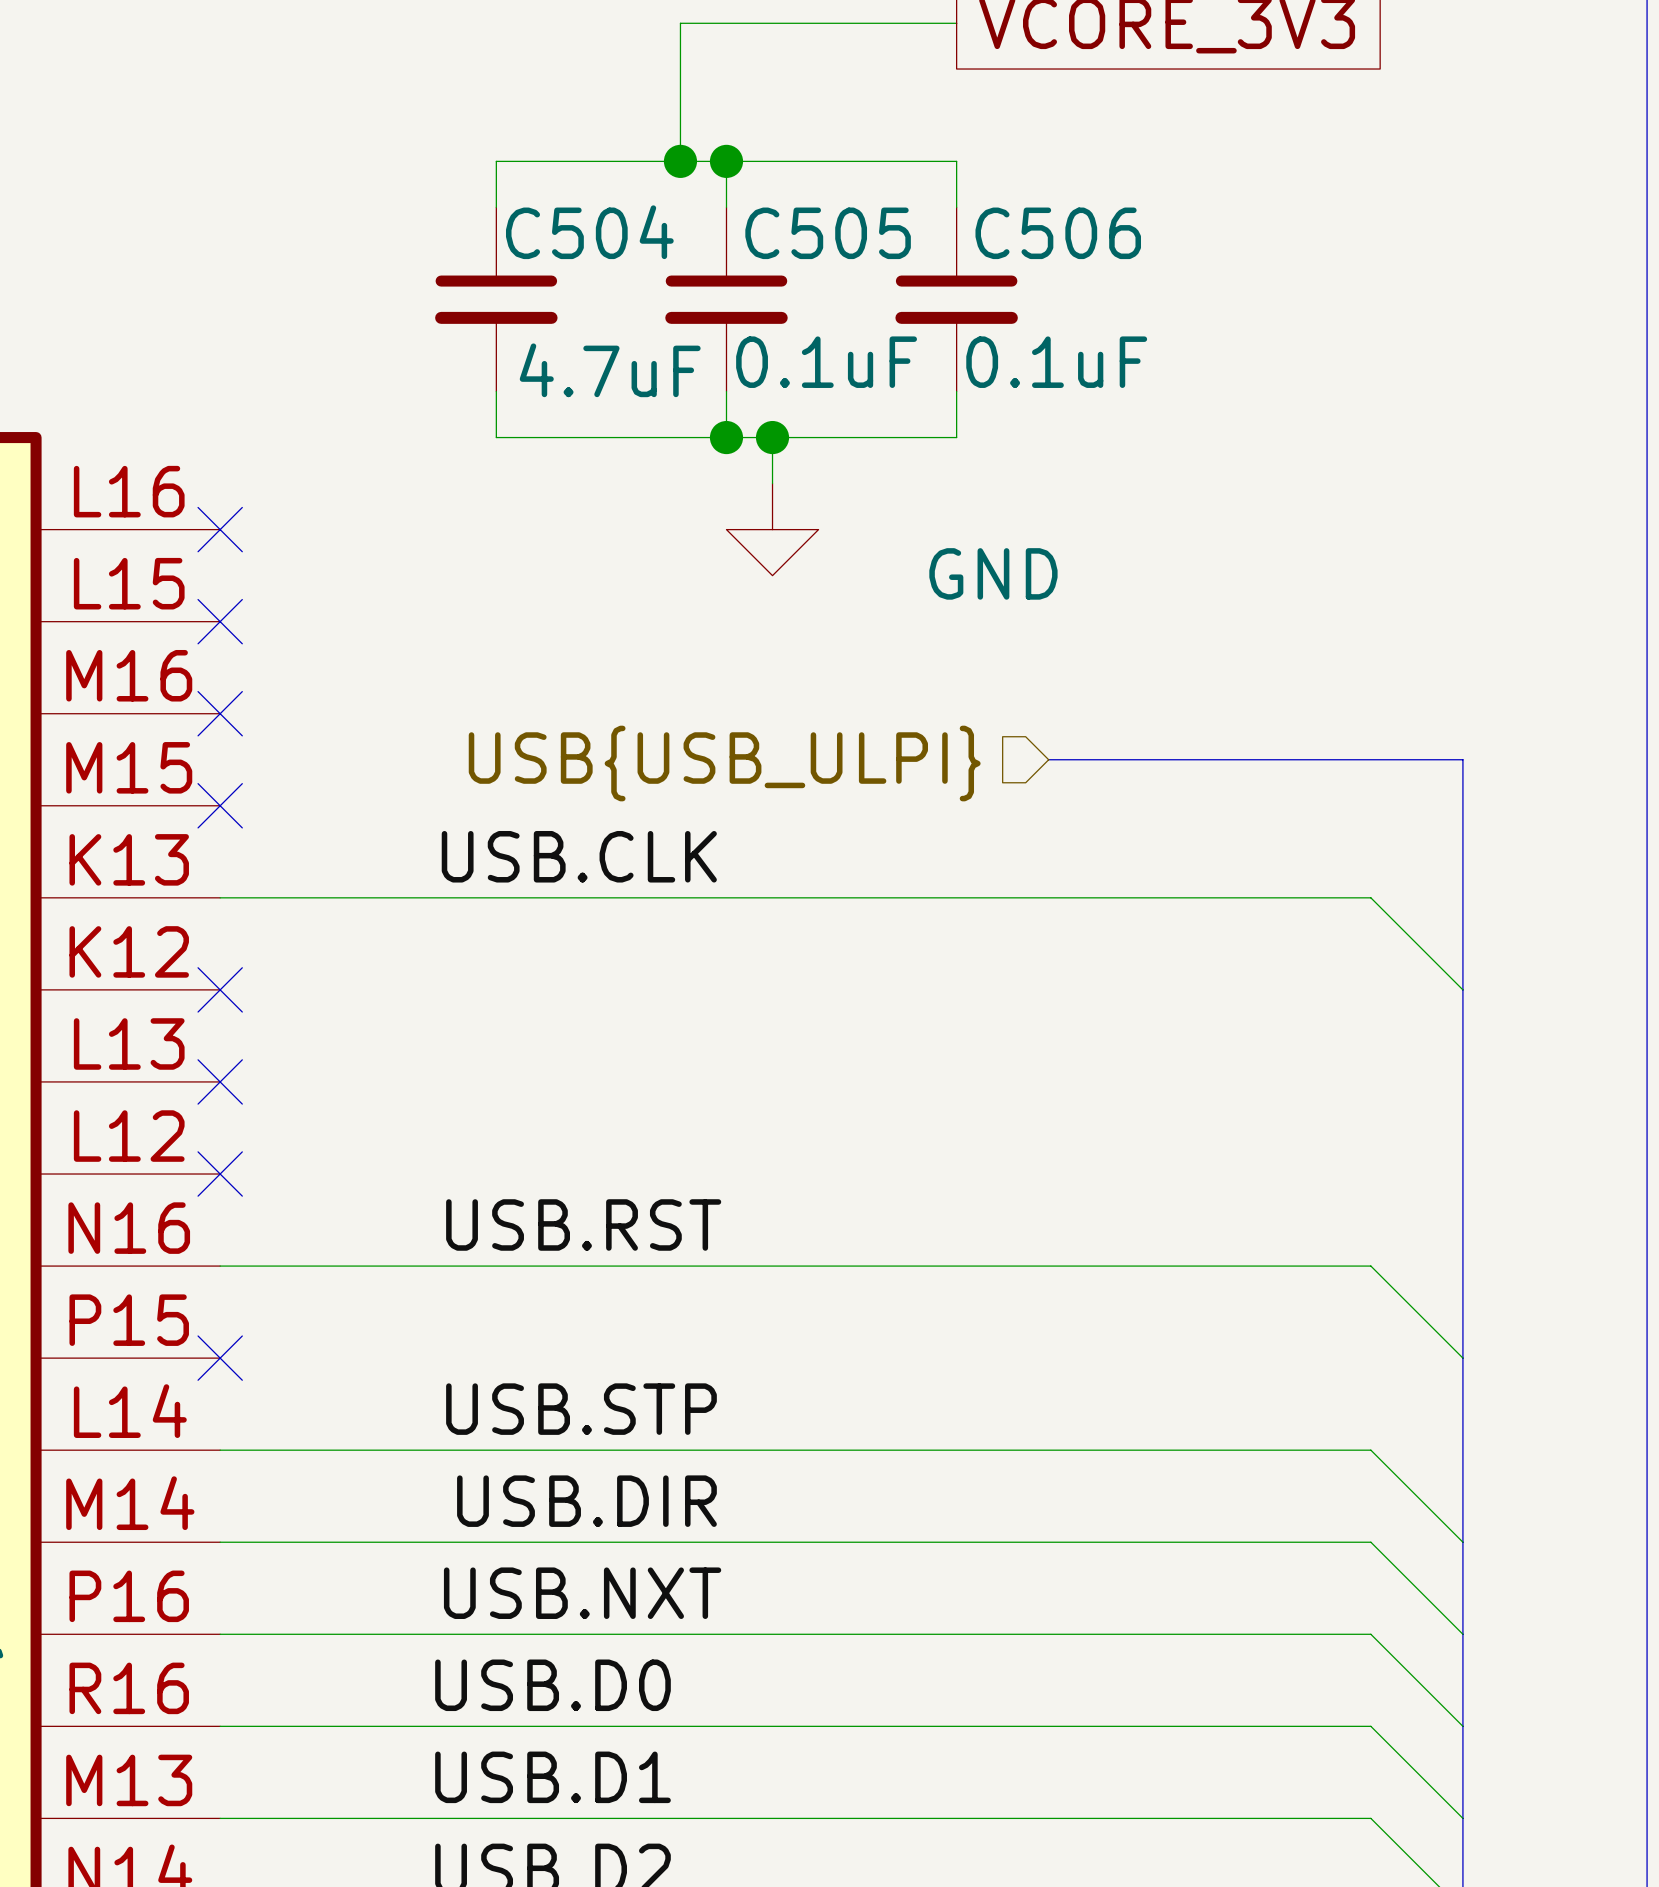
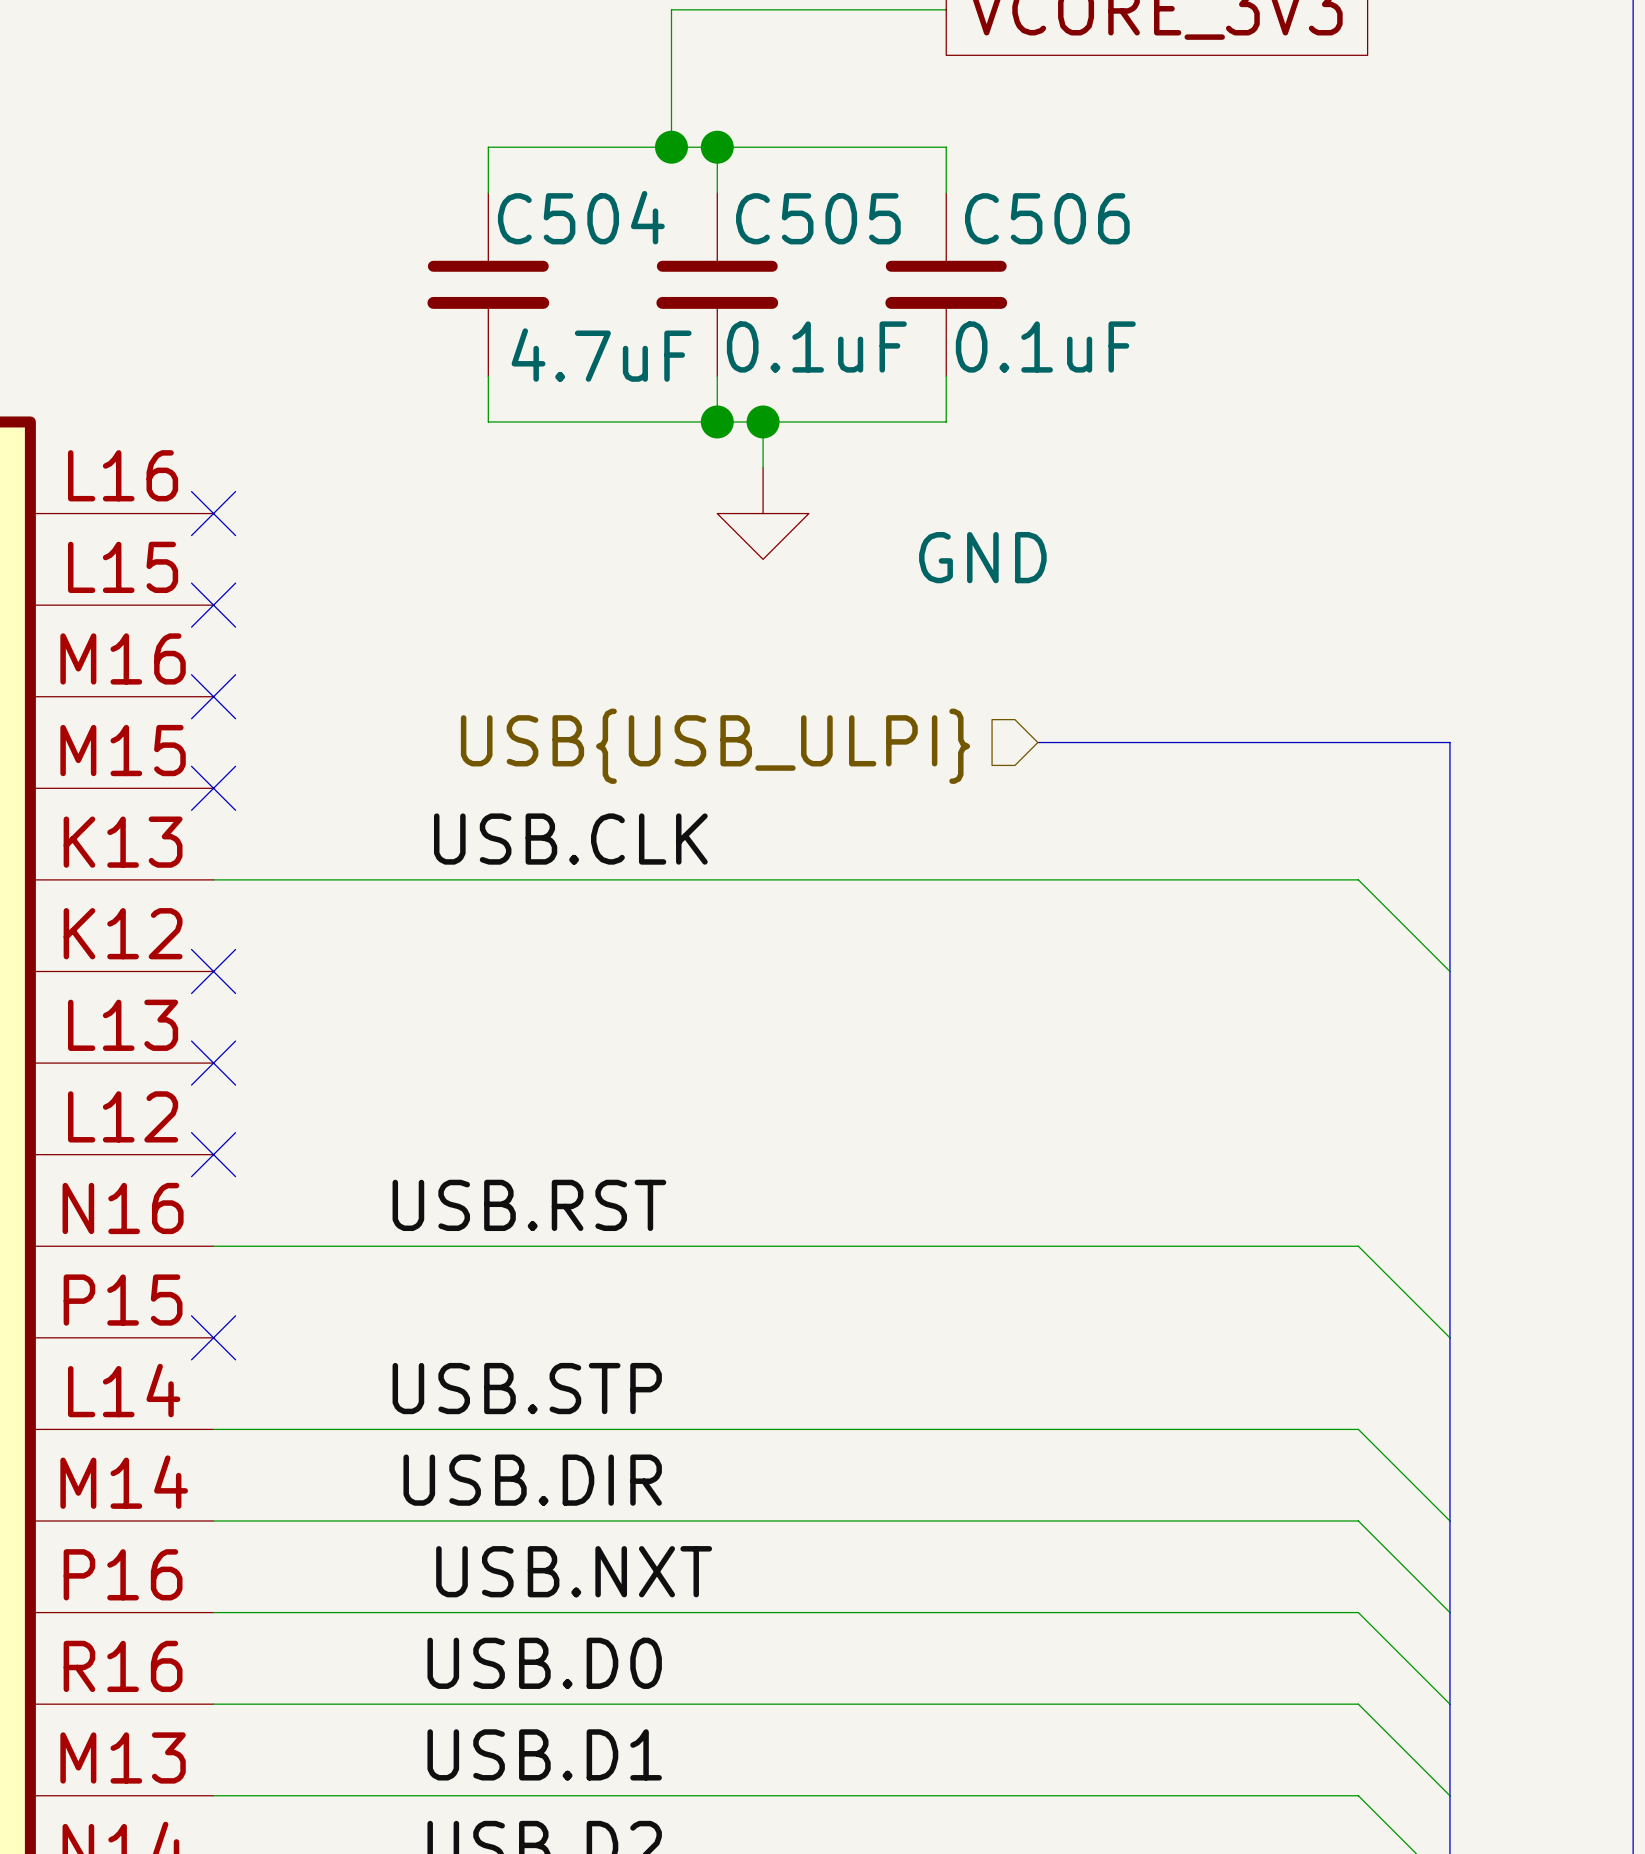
label position: USB.RST (583, 1224) -> USB.RST (529, 1205)
label position: USB.STP (581, 1409) -> USB.STP (527, 1388)
label position: USB.DIR (586, 1501) -> USB.DIR (532, 1480)

